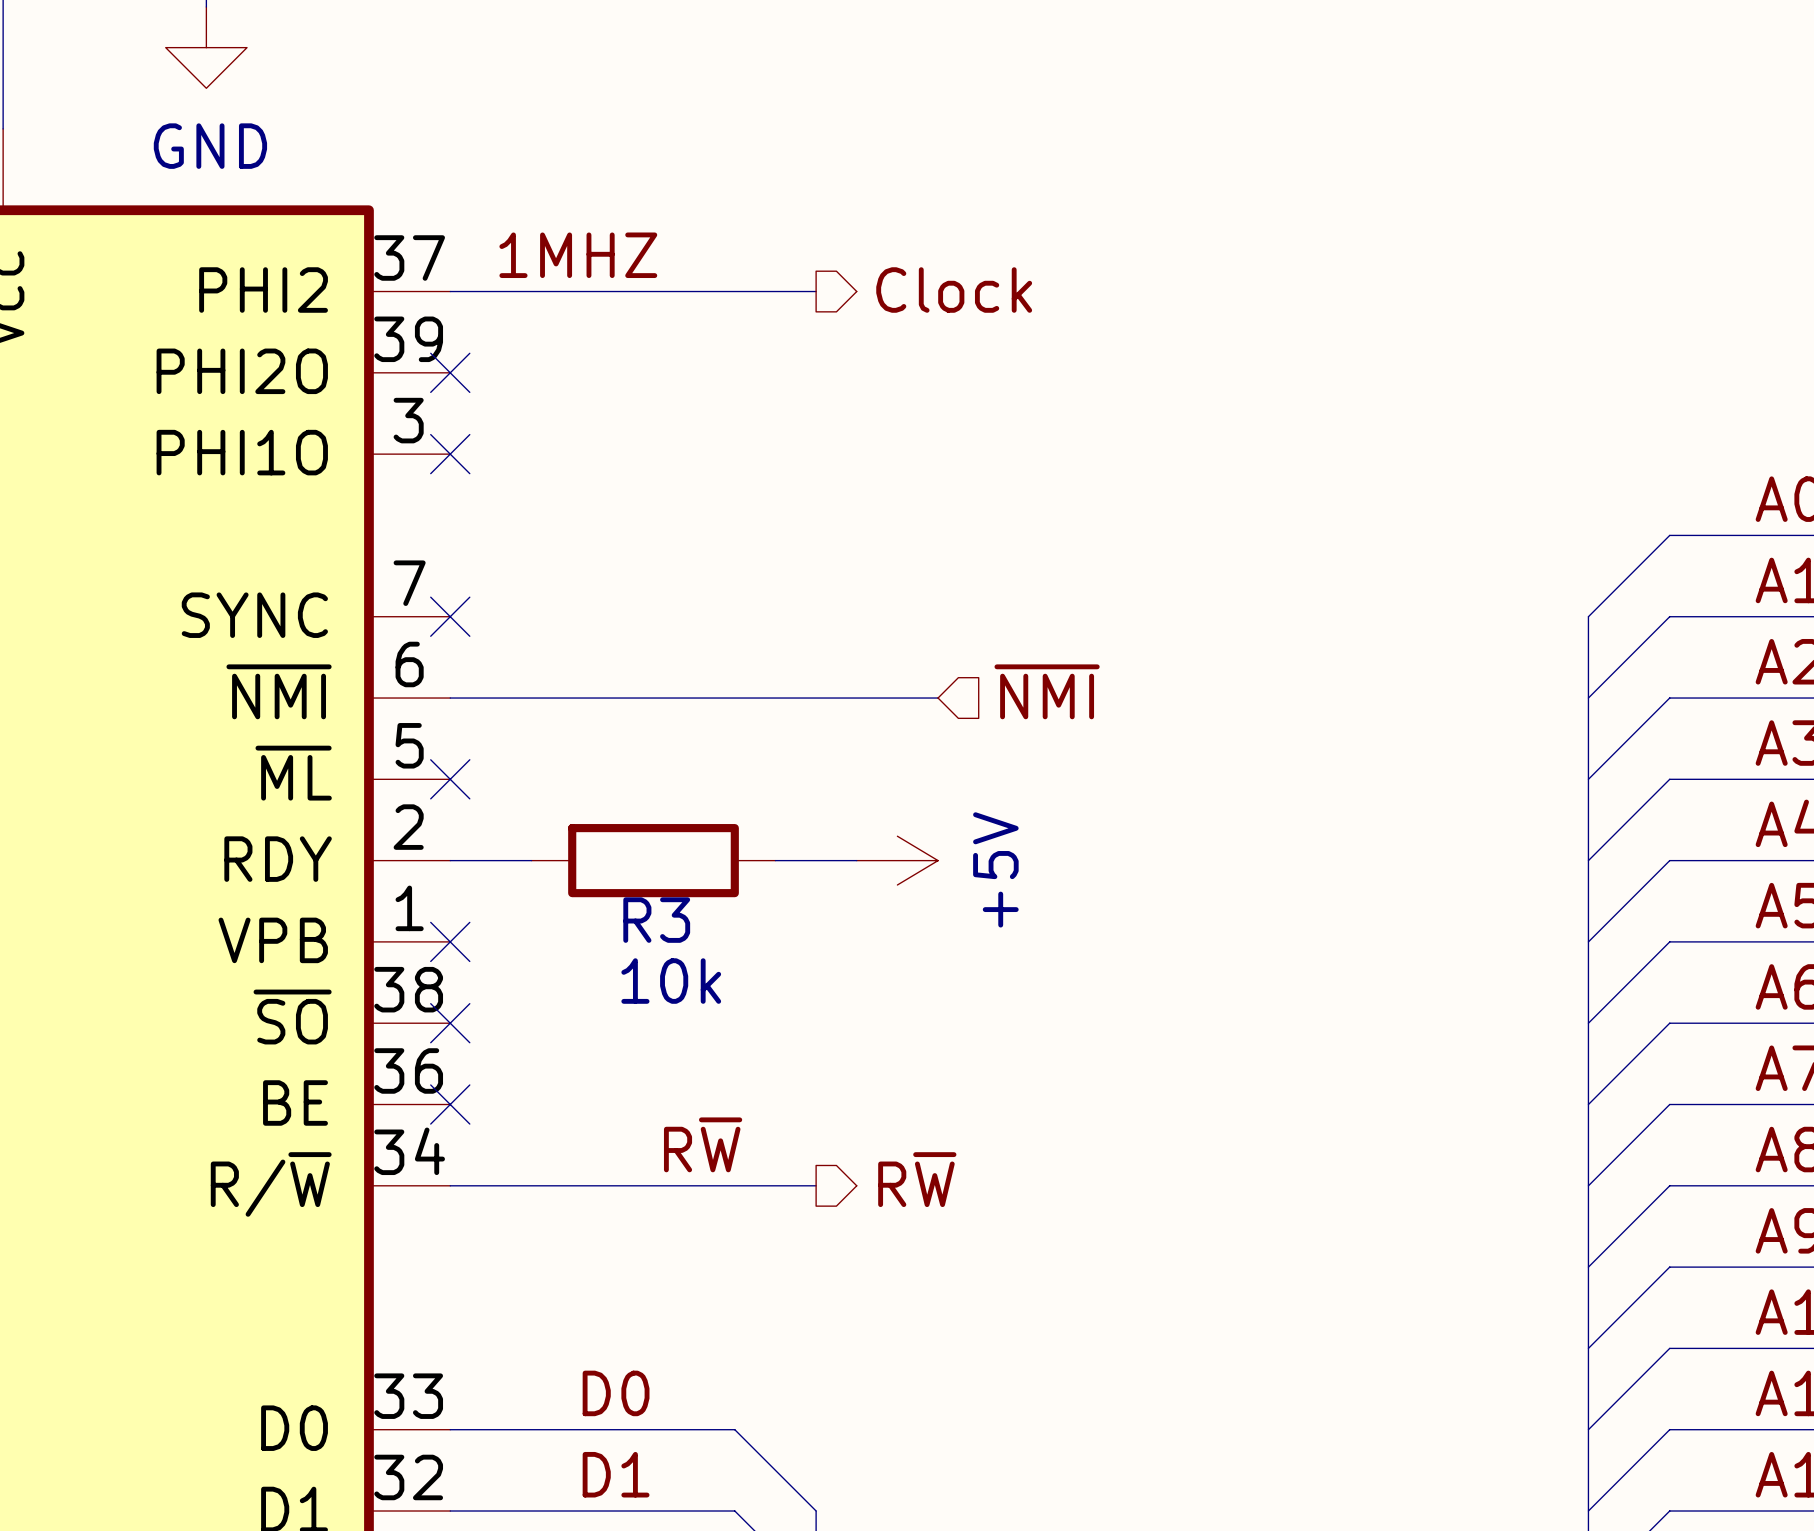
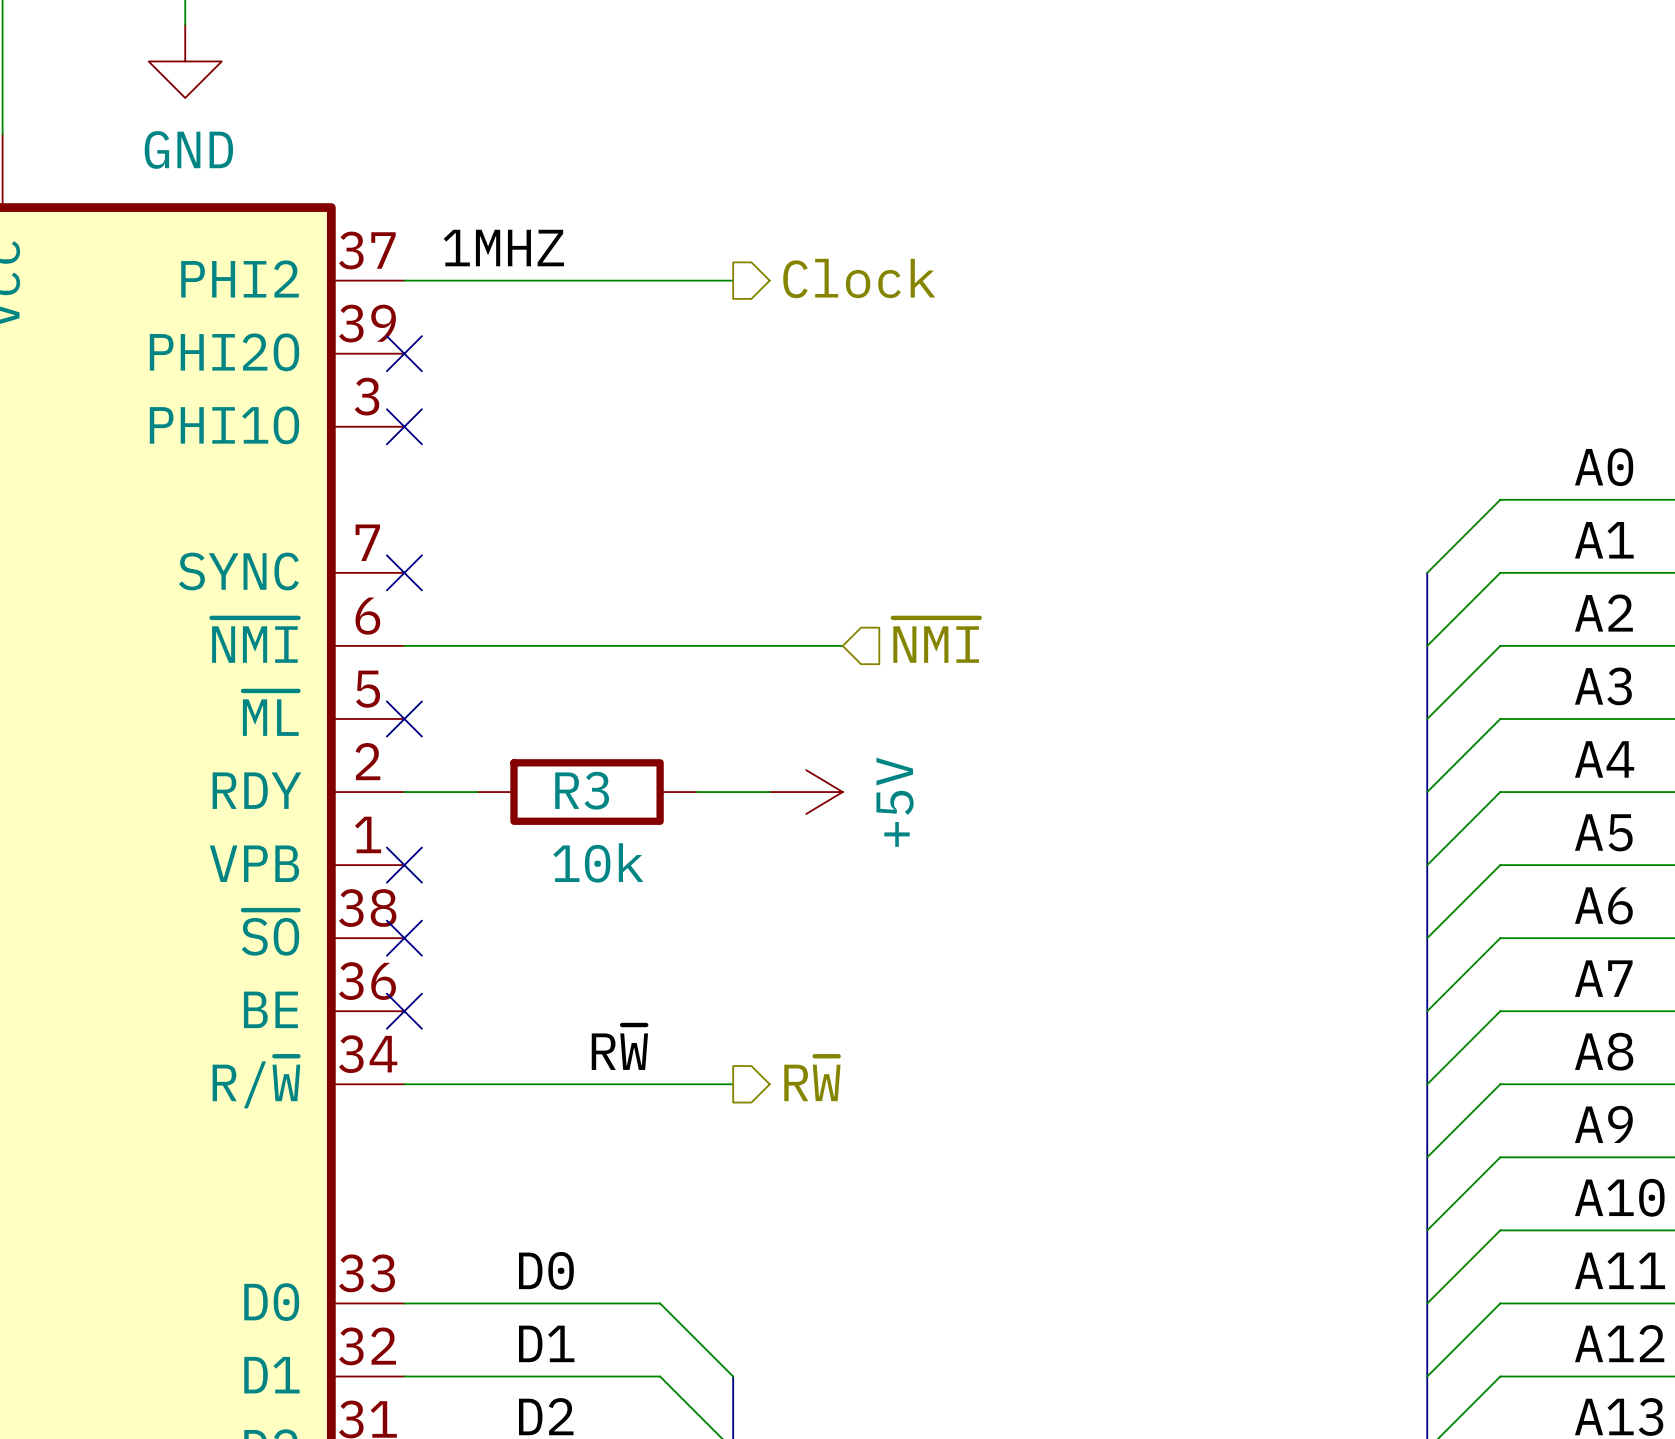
R3 name position: R3 (656, 920) -> R3 (582, 790)
R3 value position: 10k (671, 981) -> 10k (598, 862)

